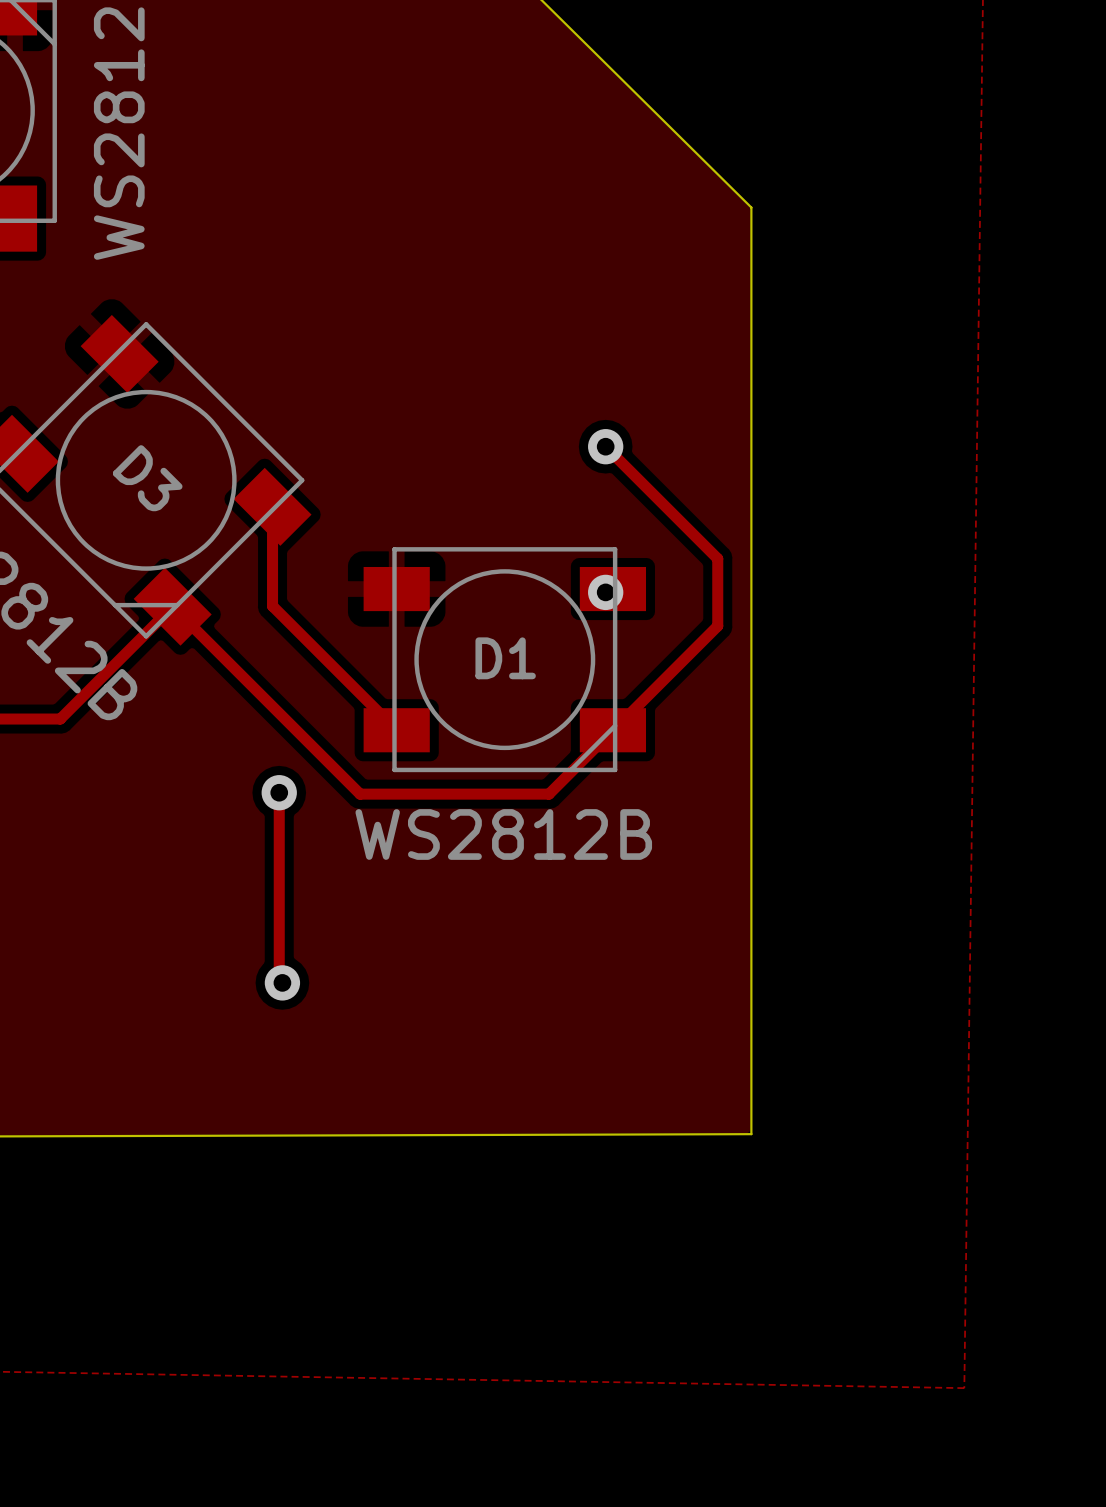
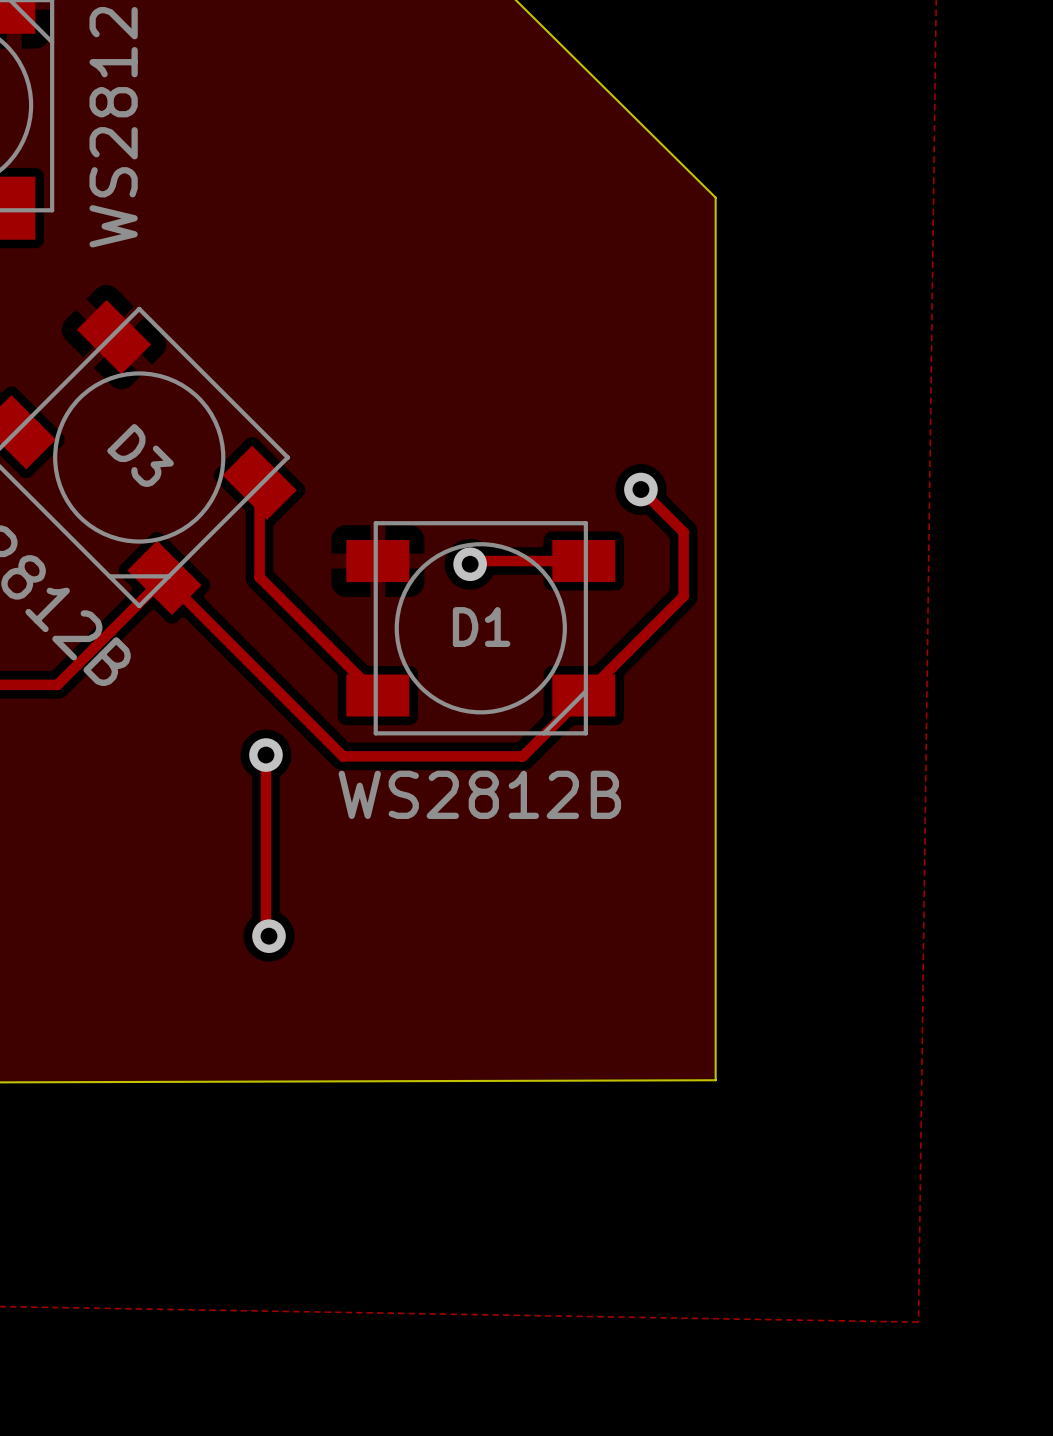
track: (605, 446) (672, 513) -> none
via: (605, 446) -> none
via: none -> (640, 489)
track: none -> (583, 561) (473, 561) (470, 564)
via: none -> (470, 564)
via: (605, 592) -> none

